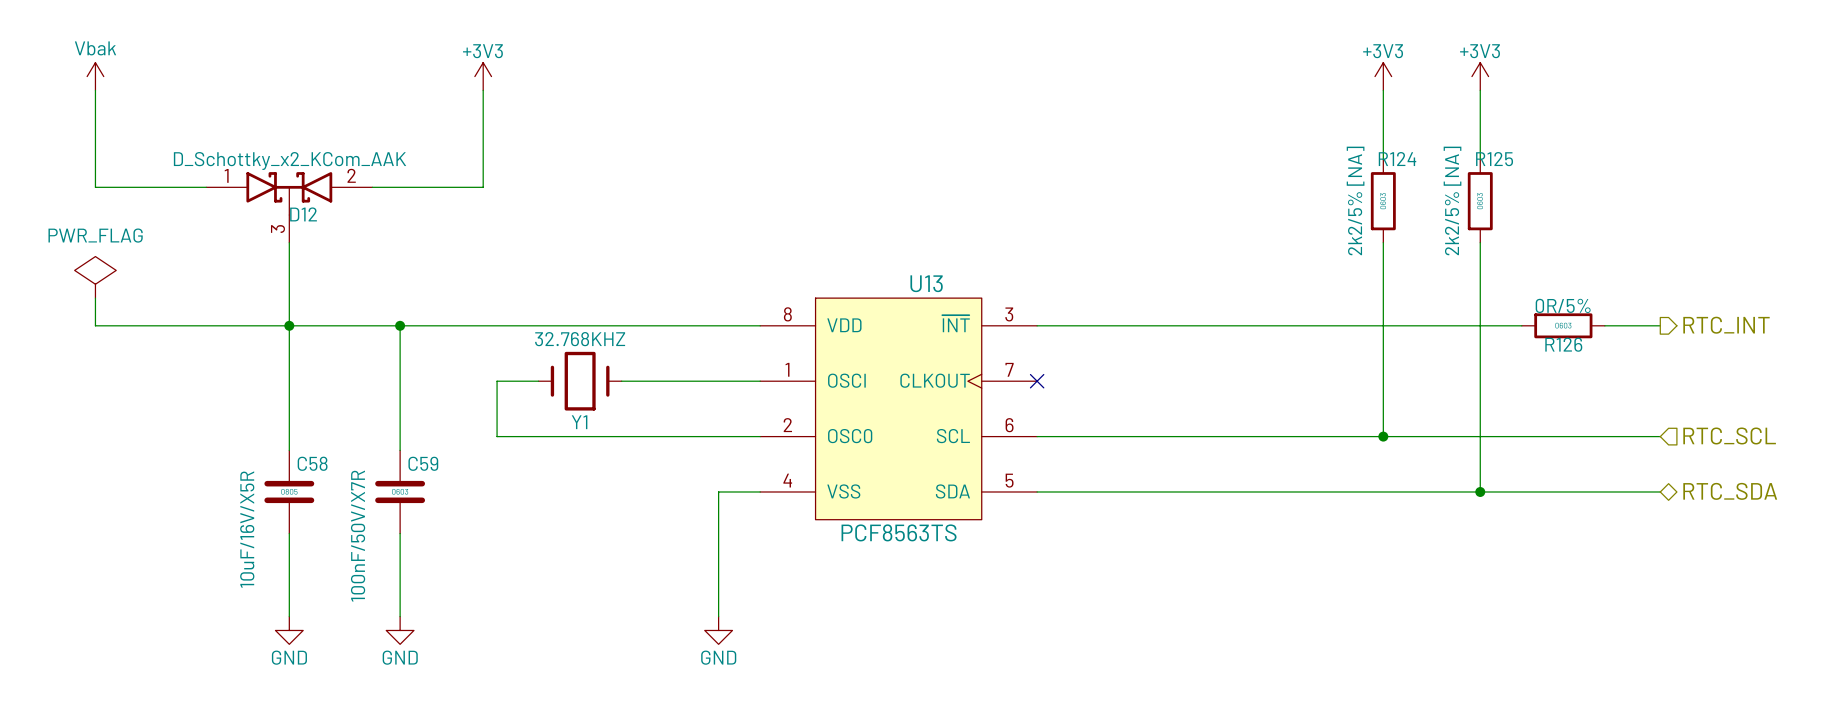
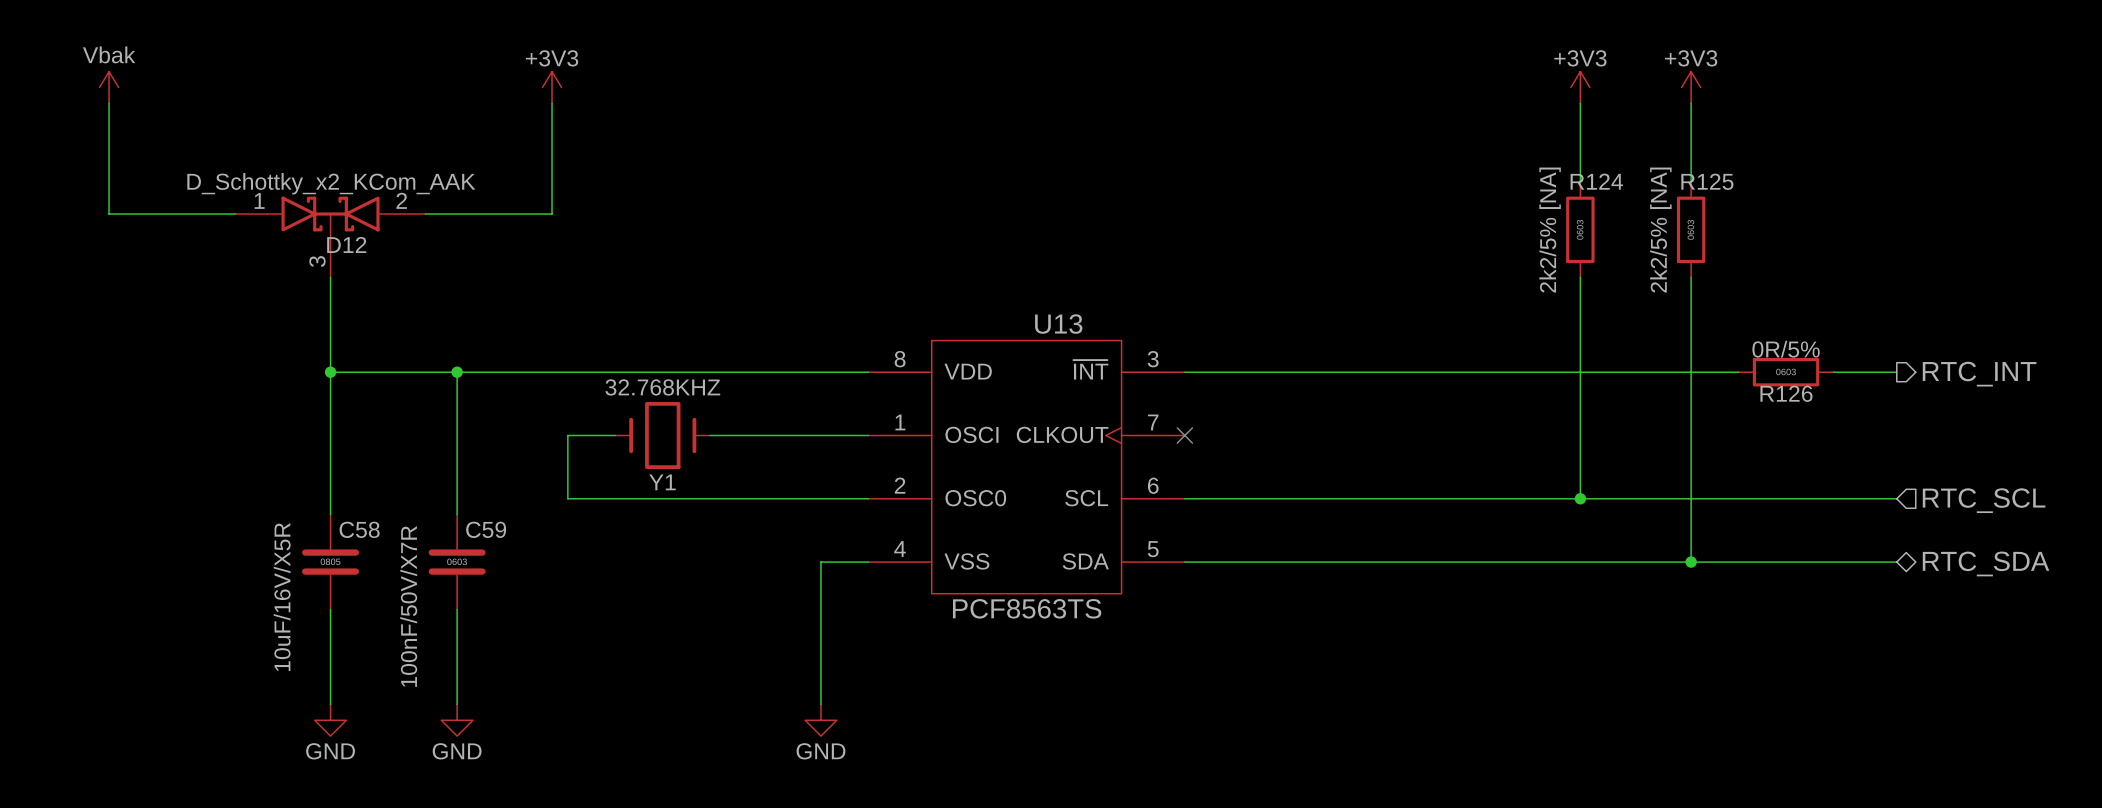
power symbol: PWR_FLAG (95, 277) -> none
wire: (95, 298) (95, 325) (289, 325) -> none

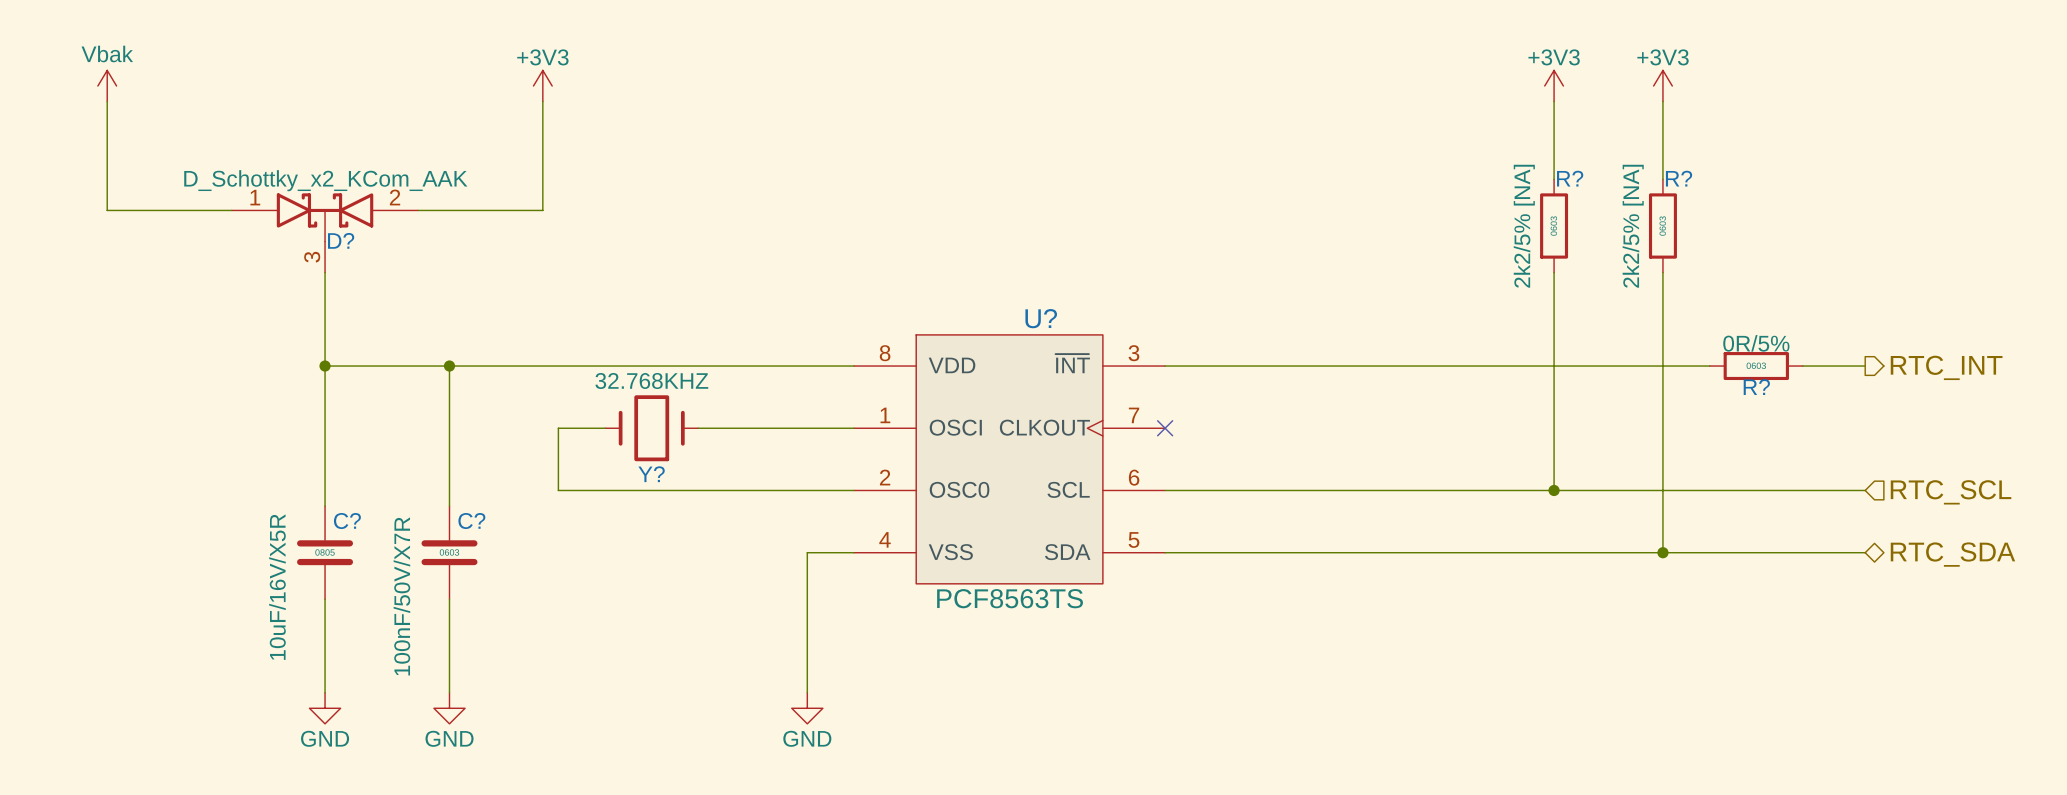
R124 name: R124 (1596, 181) -> R? (1570, 178)
R125 name: R125 (1707, 181) -> R? (1679, 178)
D12 name: D12 (346, 244) -> D? (341, 240)
U13 name: U13 (1058, 324) -> U? (1041, 318)
R126 name: R126 (1786, 393) -> R? (1756, 387)
Y1 name: Y1 (662, 482) -> Y? (651, 474)
C58 name: C58 (359, 529) -> C? (347, 521)
C59 name: C59 (486, 529) -> C? (471, 521)

